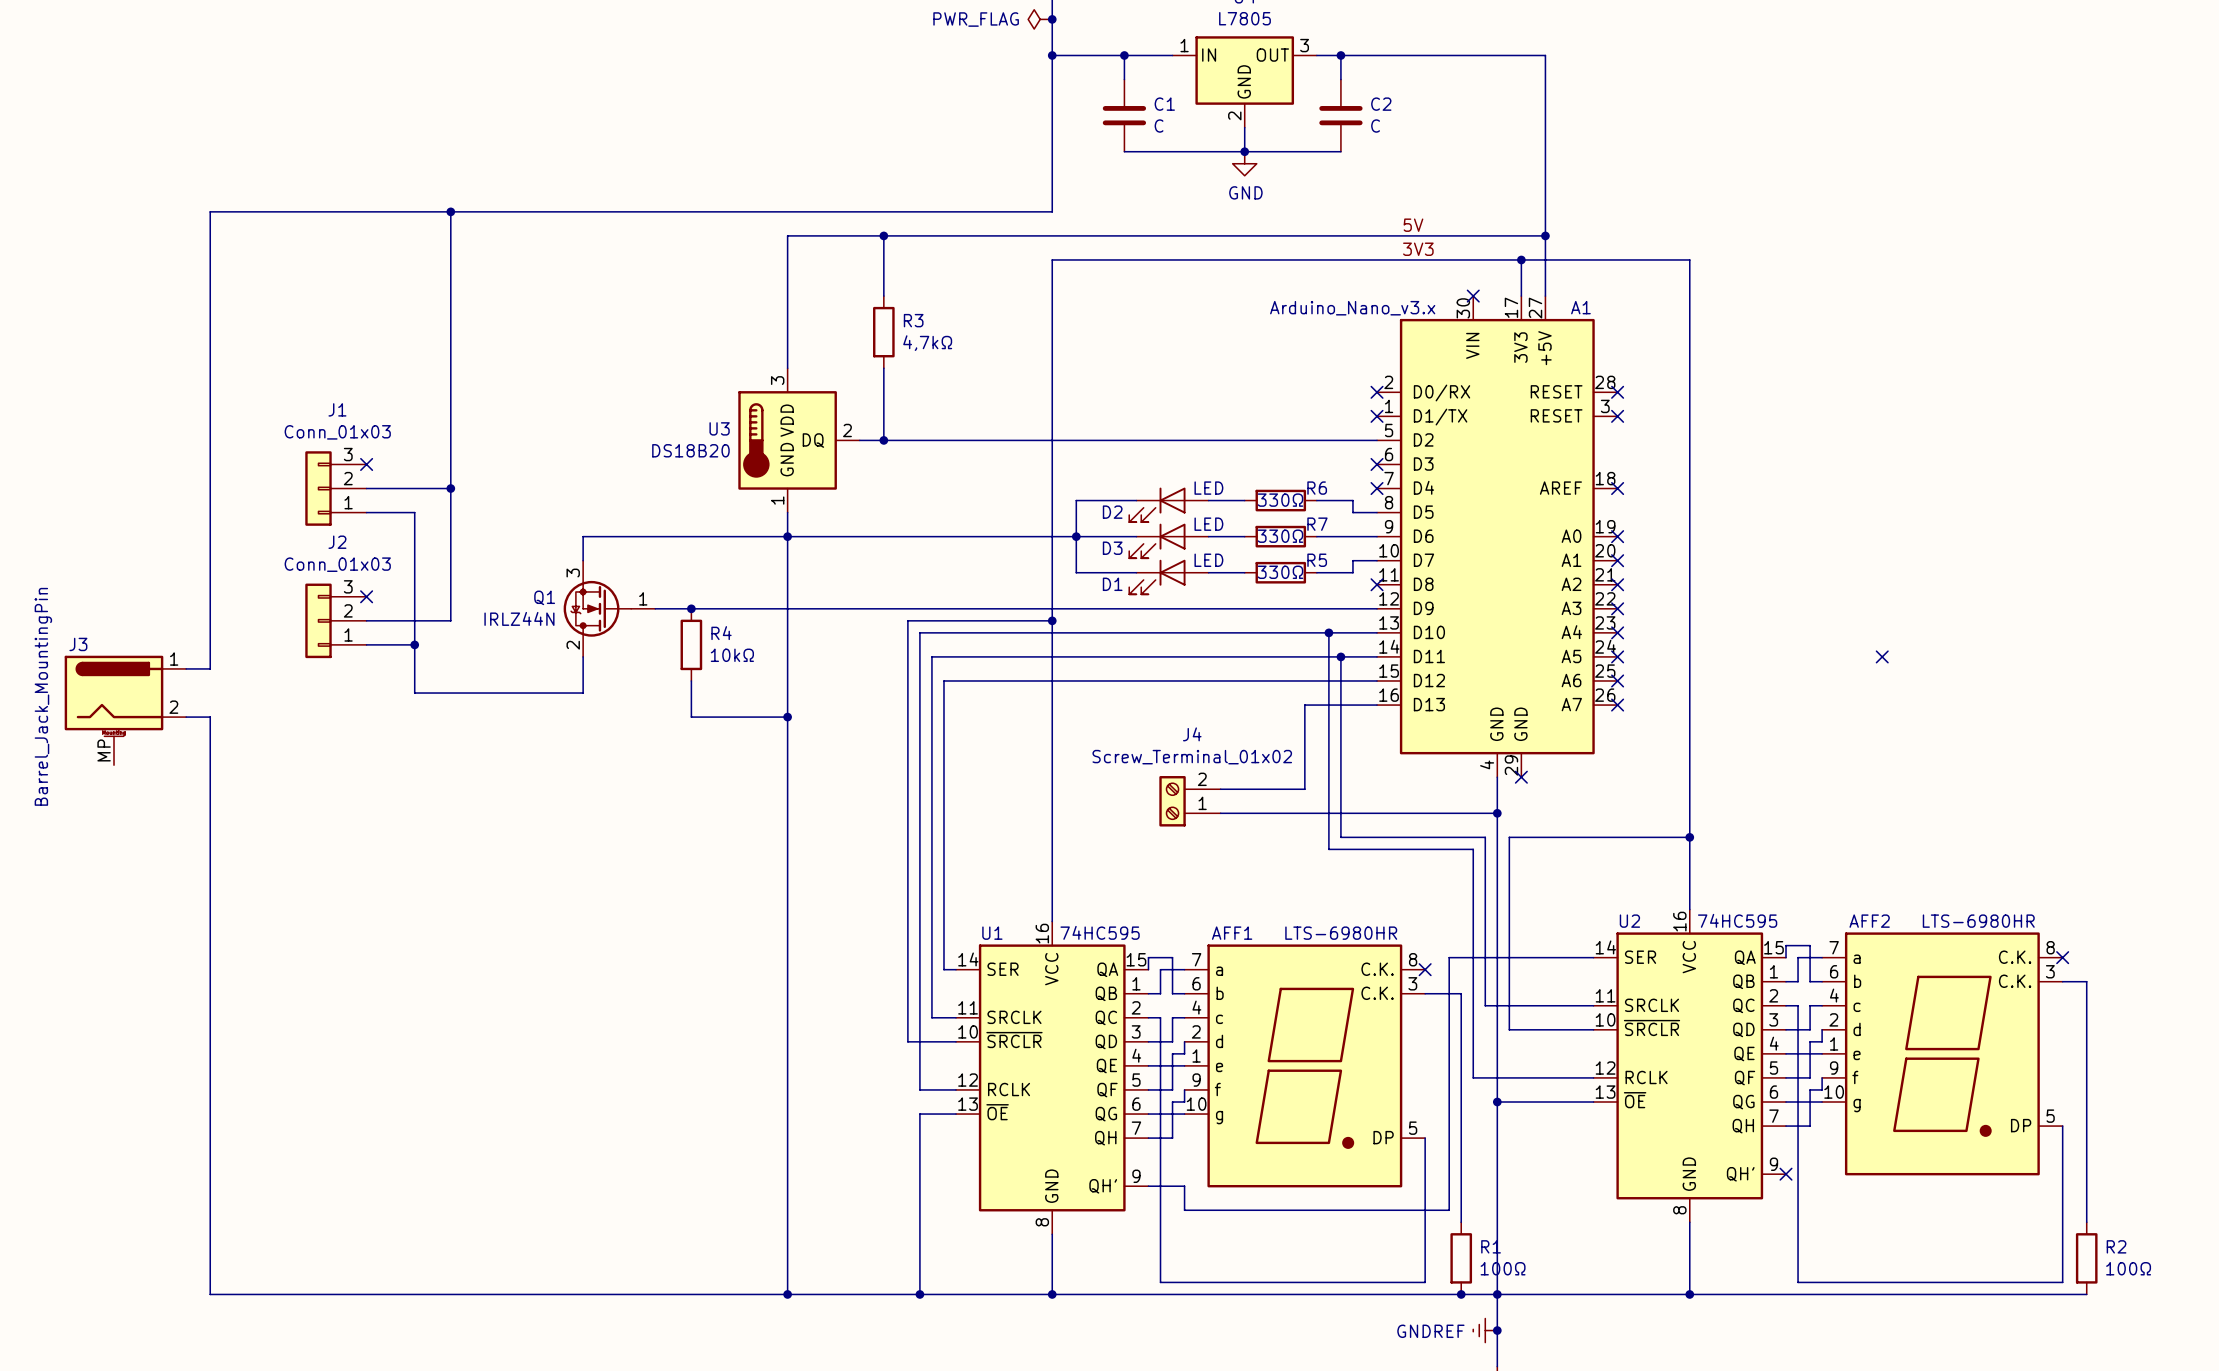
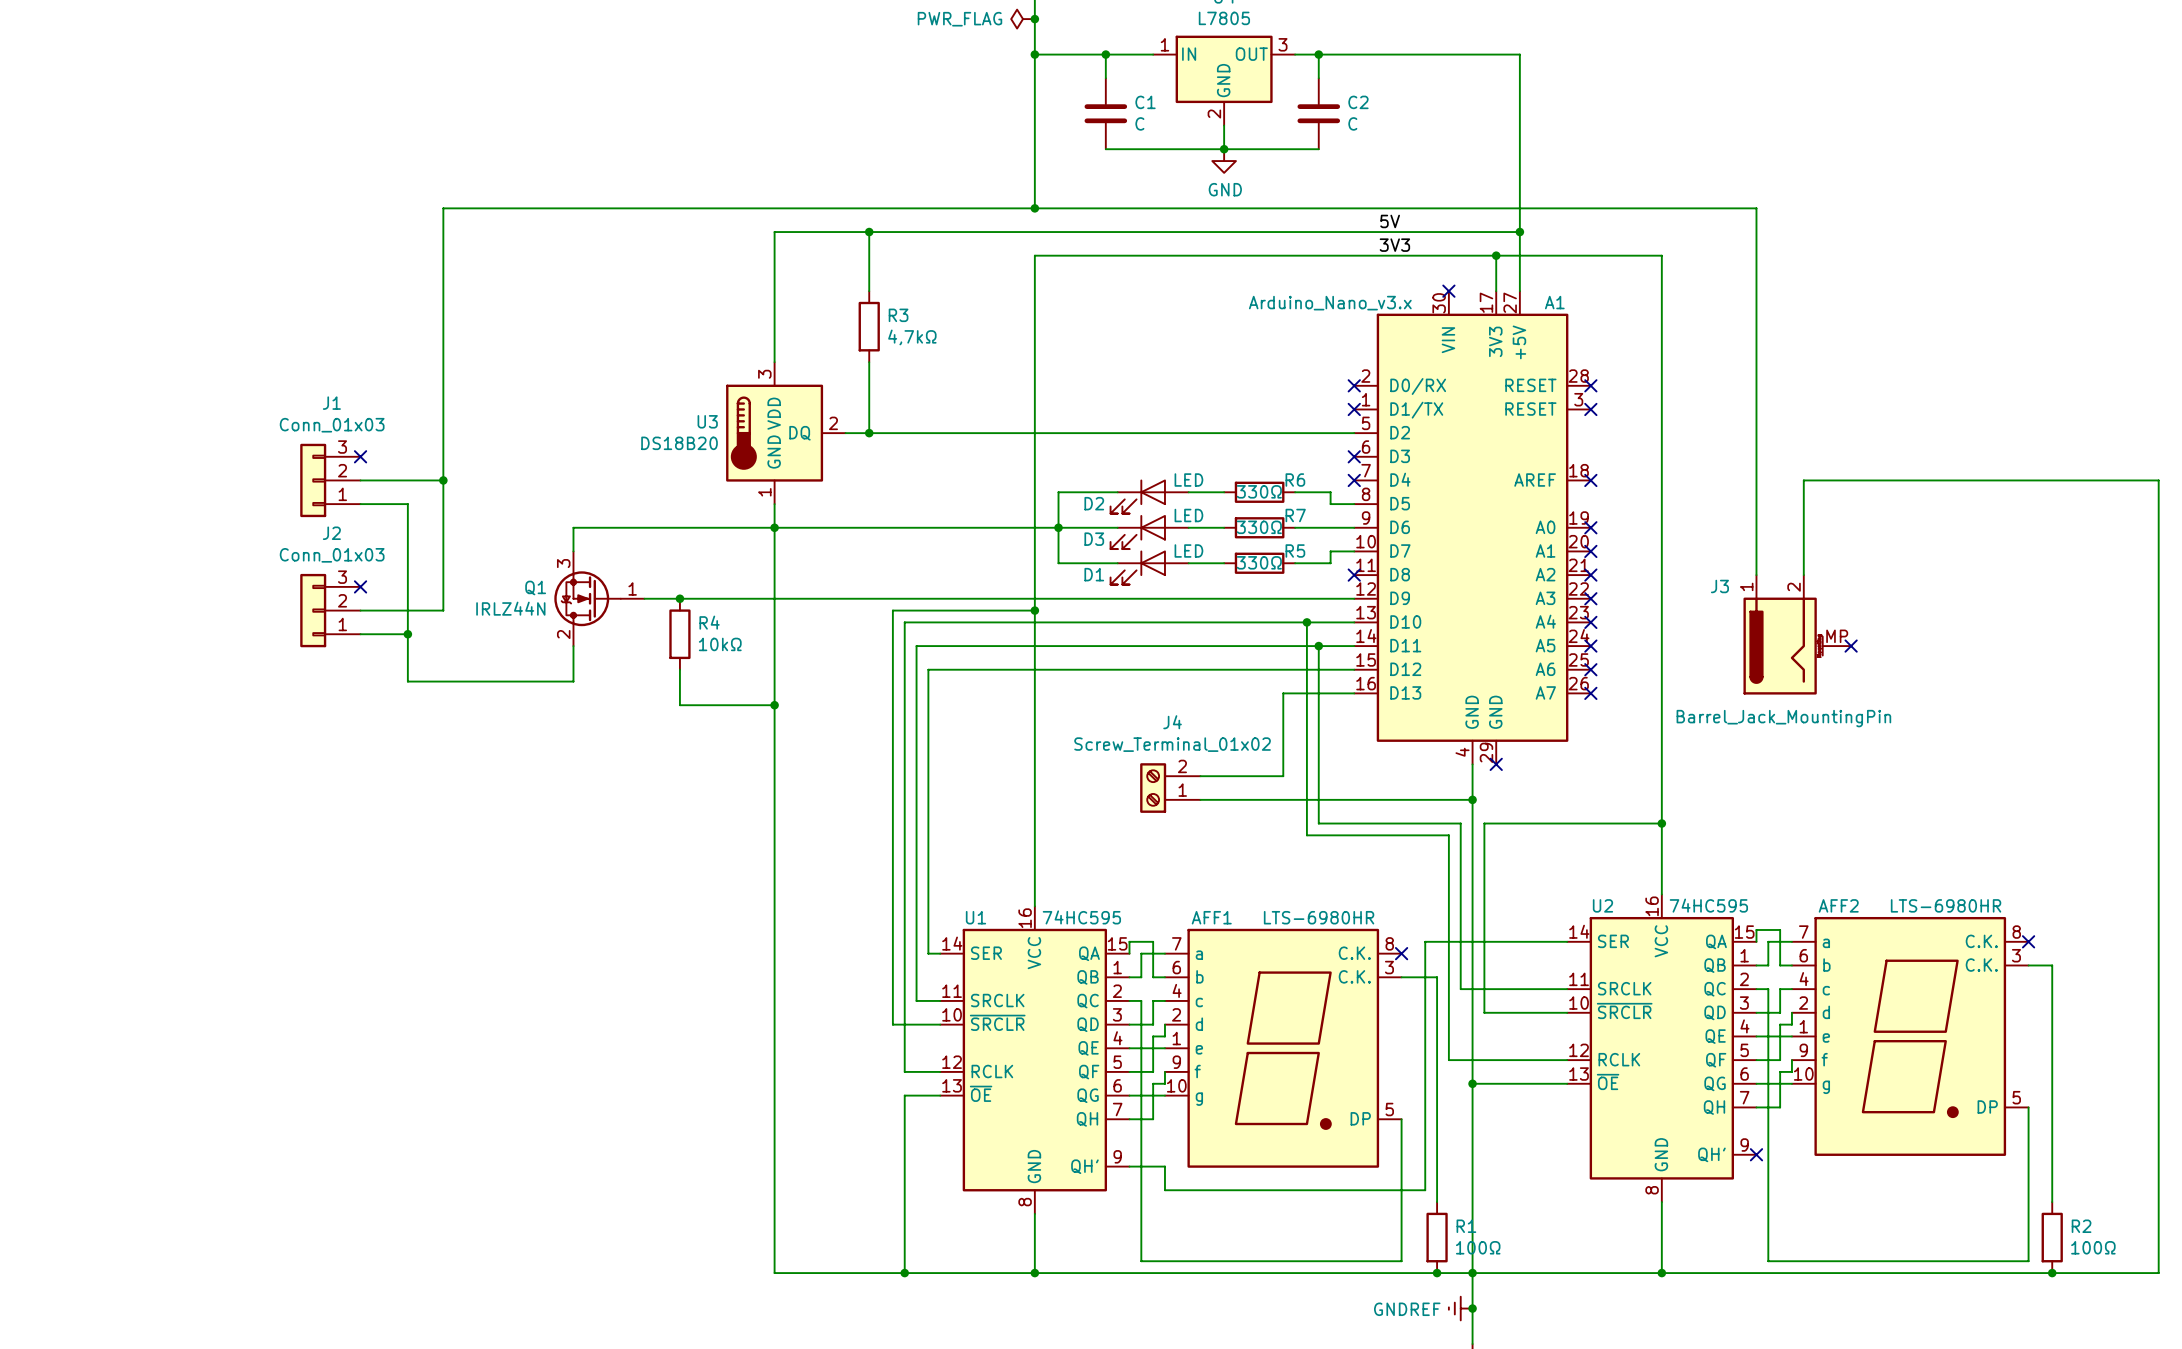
wire: (450, 211) (210, 211) (210, 668) (186, 668) -> none
junction: (450, 211) -> none
wire: none -> (1034, 208) (1756, 208) (1756, 575)
junction: none -> (1034, 208)
wire: none -> (1803, 575) (1803, 480) (2158, 480) (2158, 1273) (2052, 1273)
J3 name position: J3 (78, 644) -> J3 (1719, 586)
J3 rotation: 0° (114, 696) -> 90° counterclockwise (1783, 646)
J3 position: (125, 710) -> (1797, 634)
wire: (186, 717) (210, 717) (210, 1294) (787, 1294) -> none
junction: (787, 1294) -> none
junction: none -> (2052, 1273)

